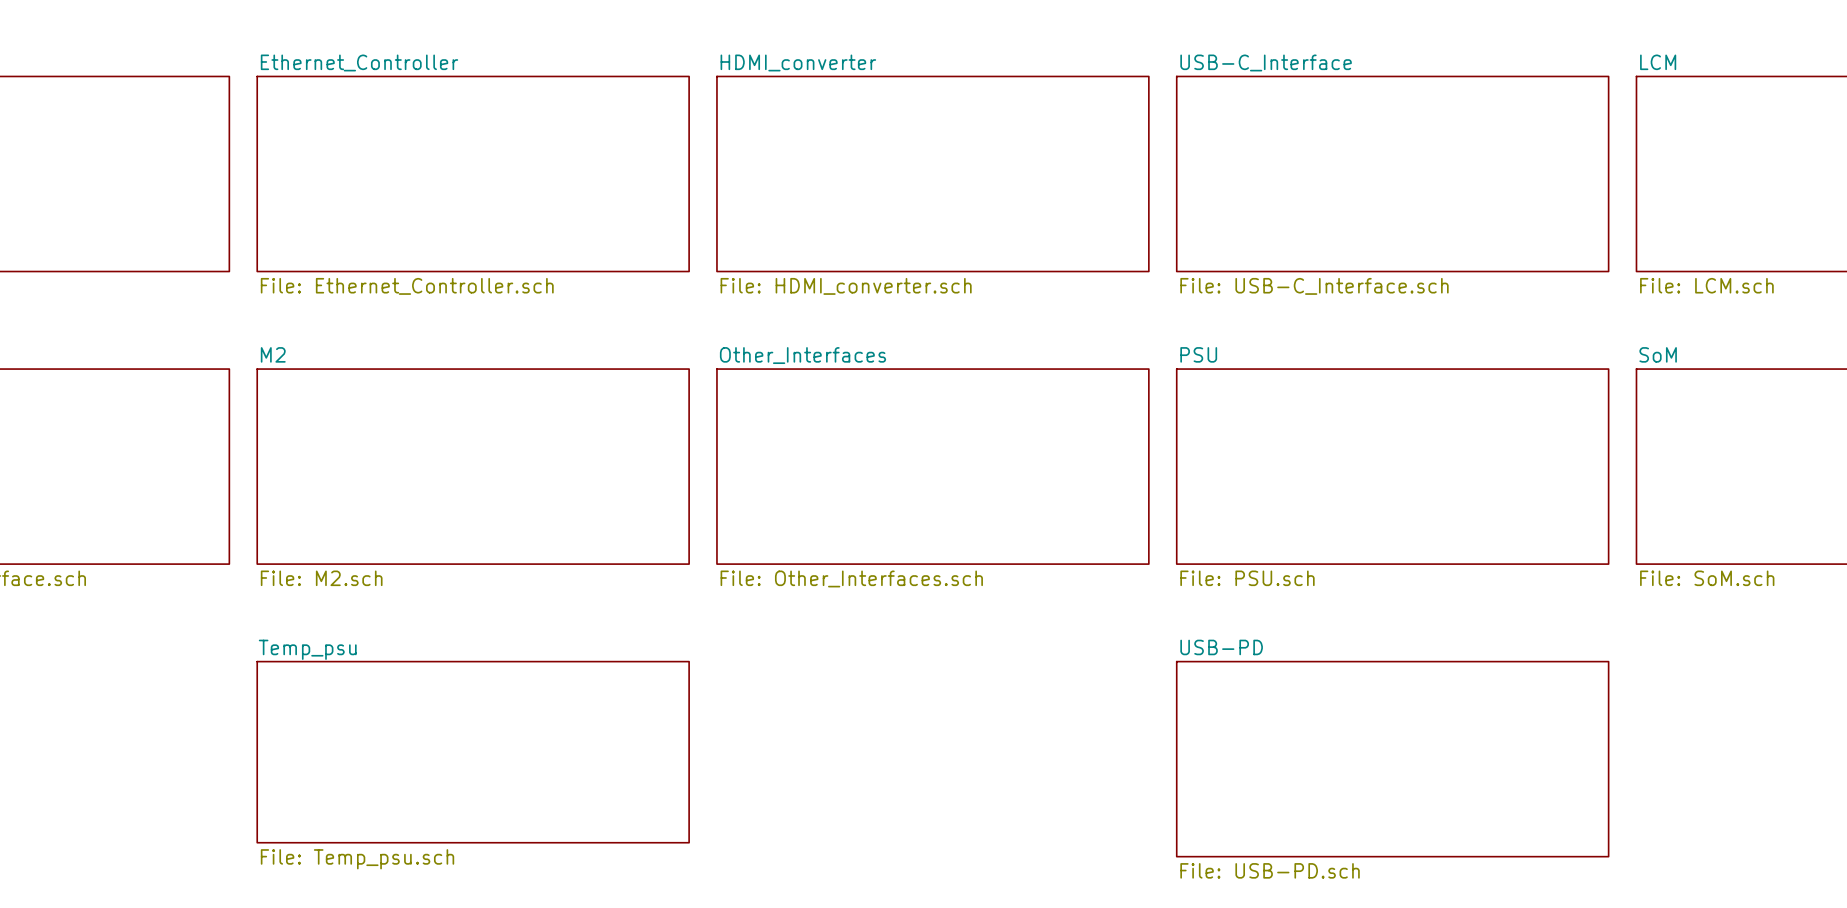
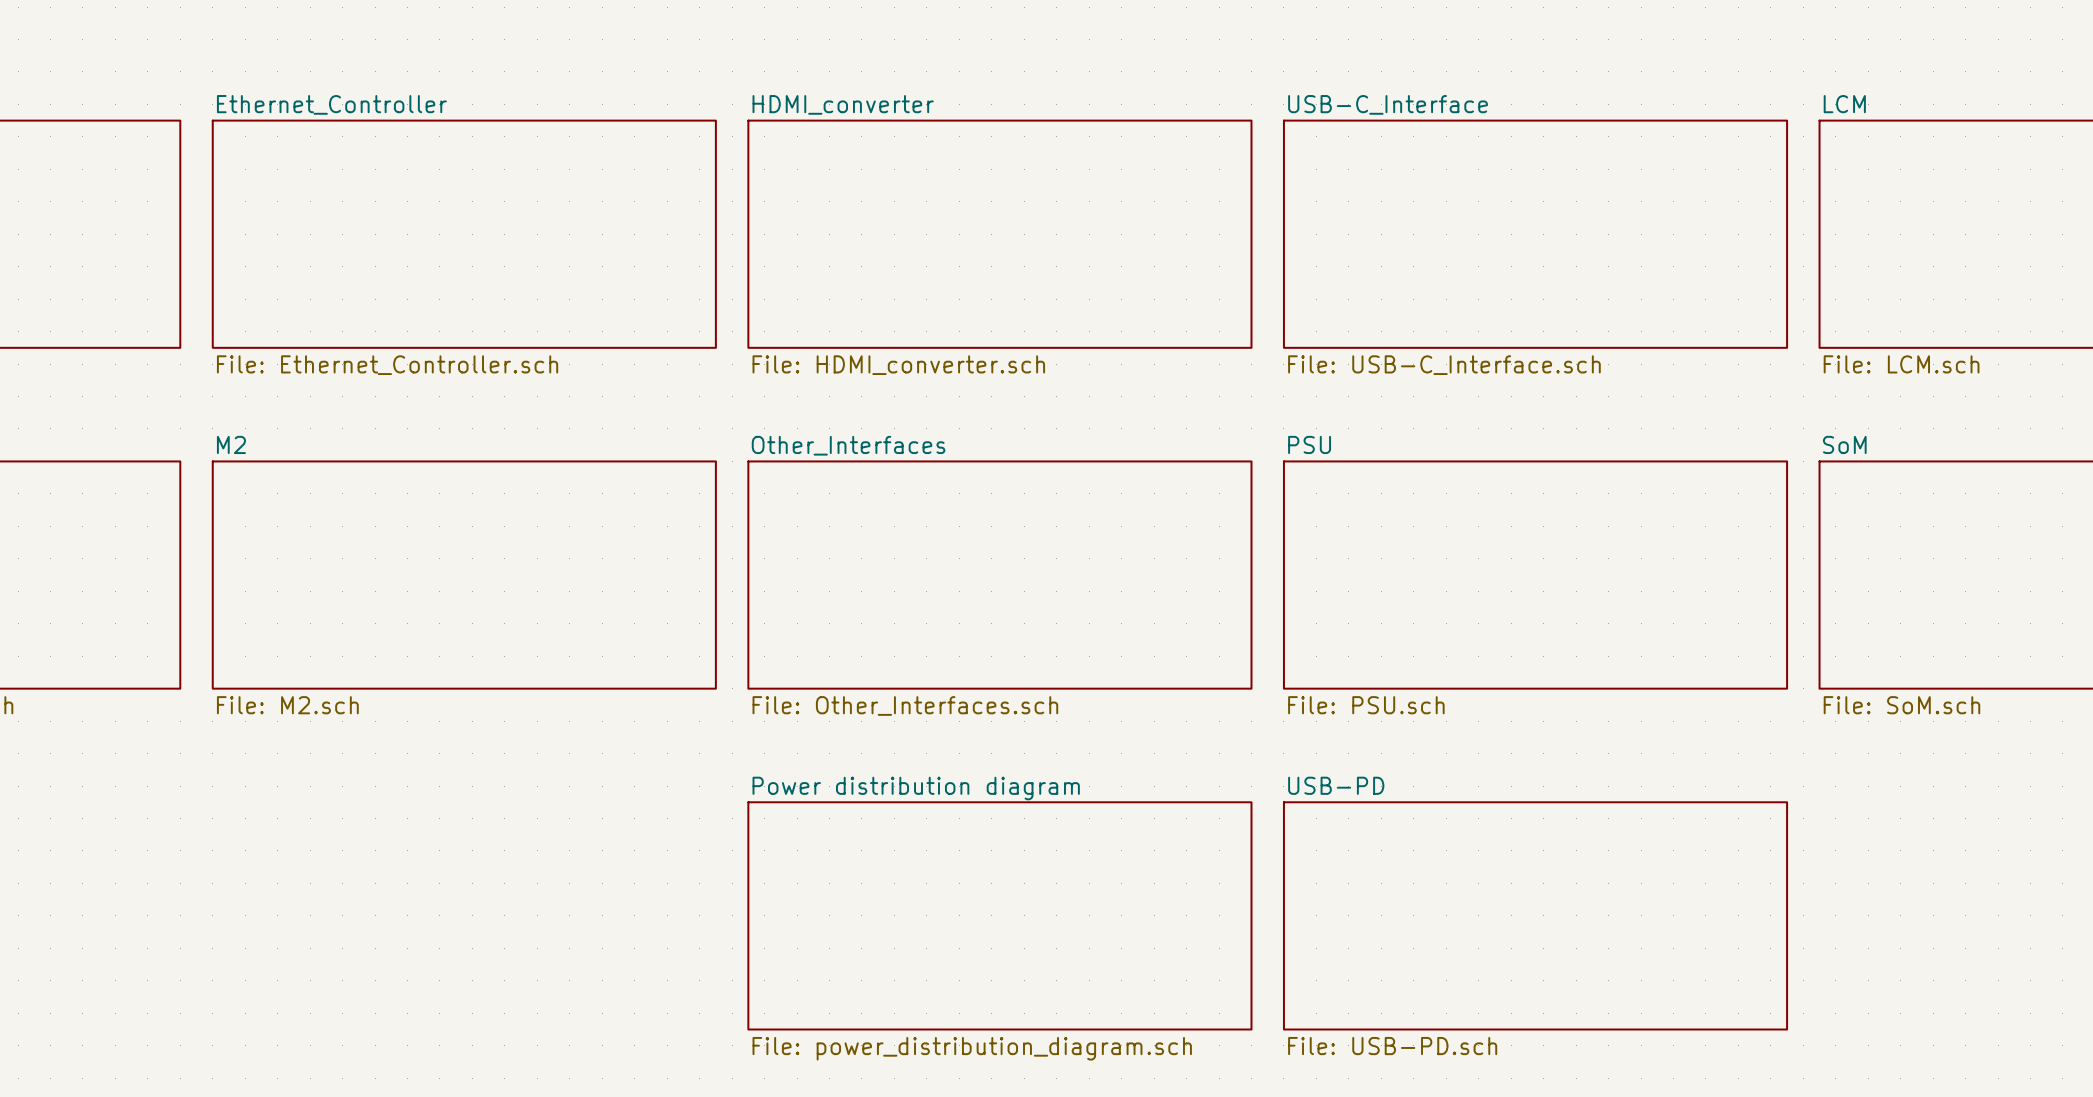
sheet Temp_psu: File: Temp_psu.sch (473, 752) -> none
sheet Power distribution diagram: none -> File: power_distribution_diagram.sch (999, 915)

